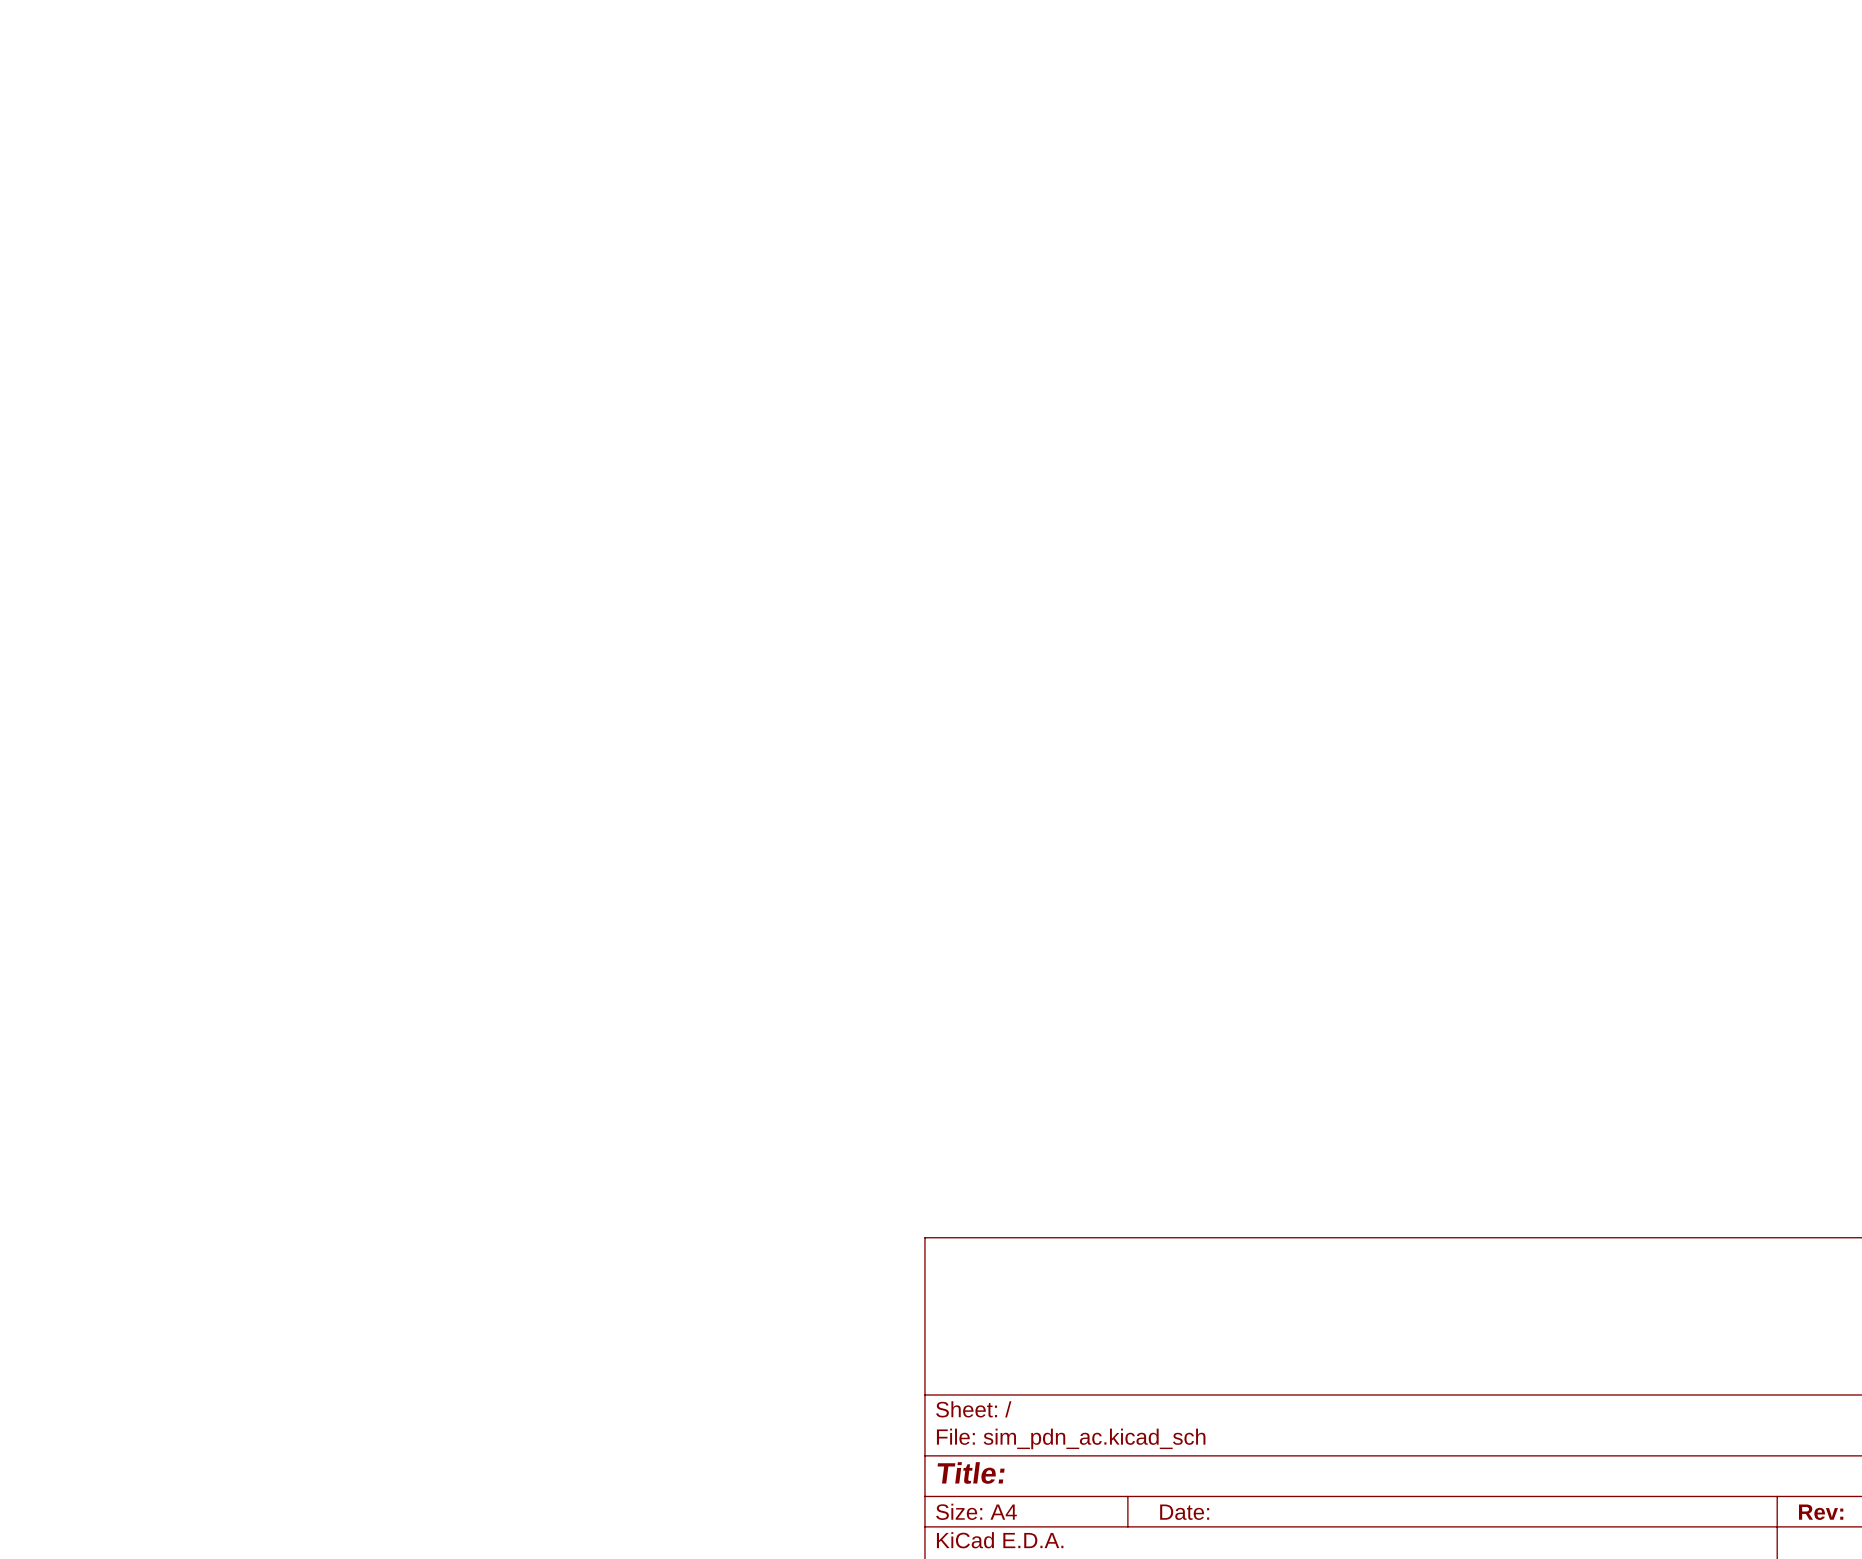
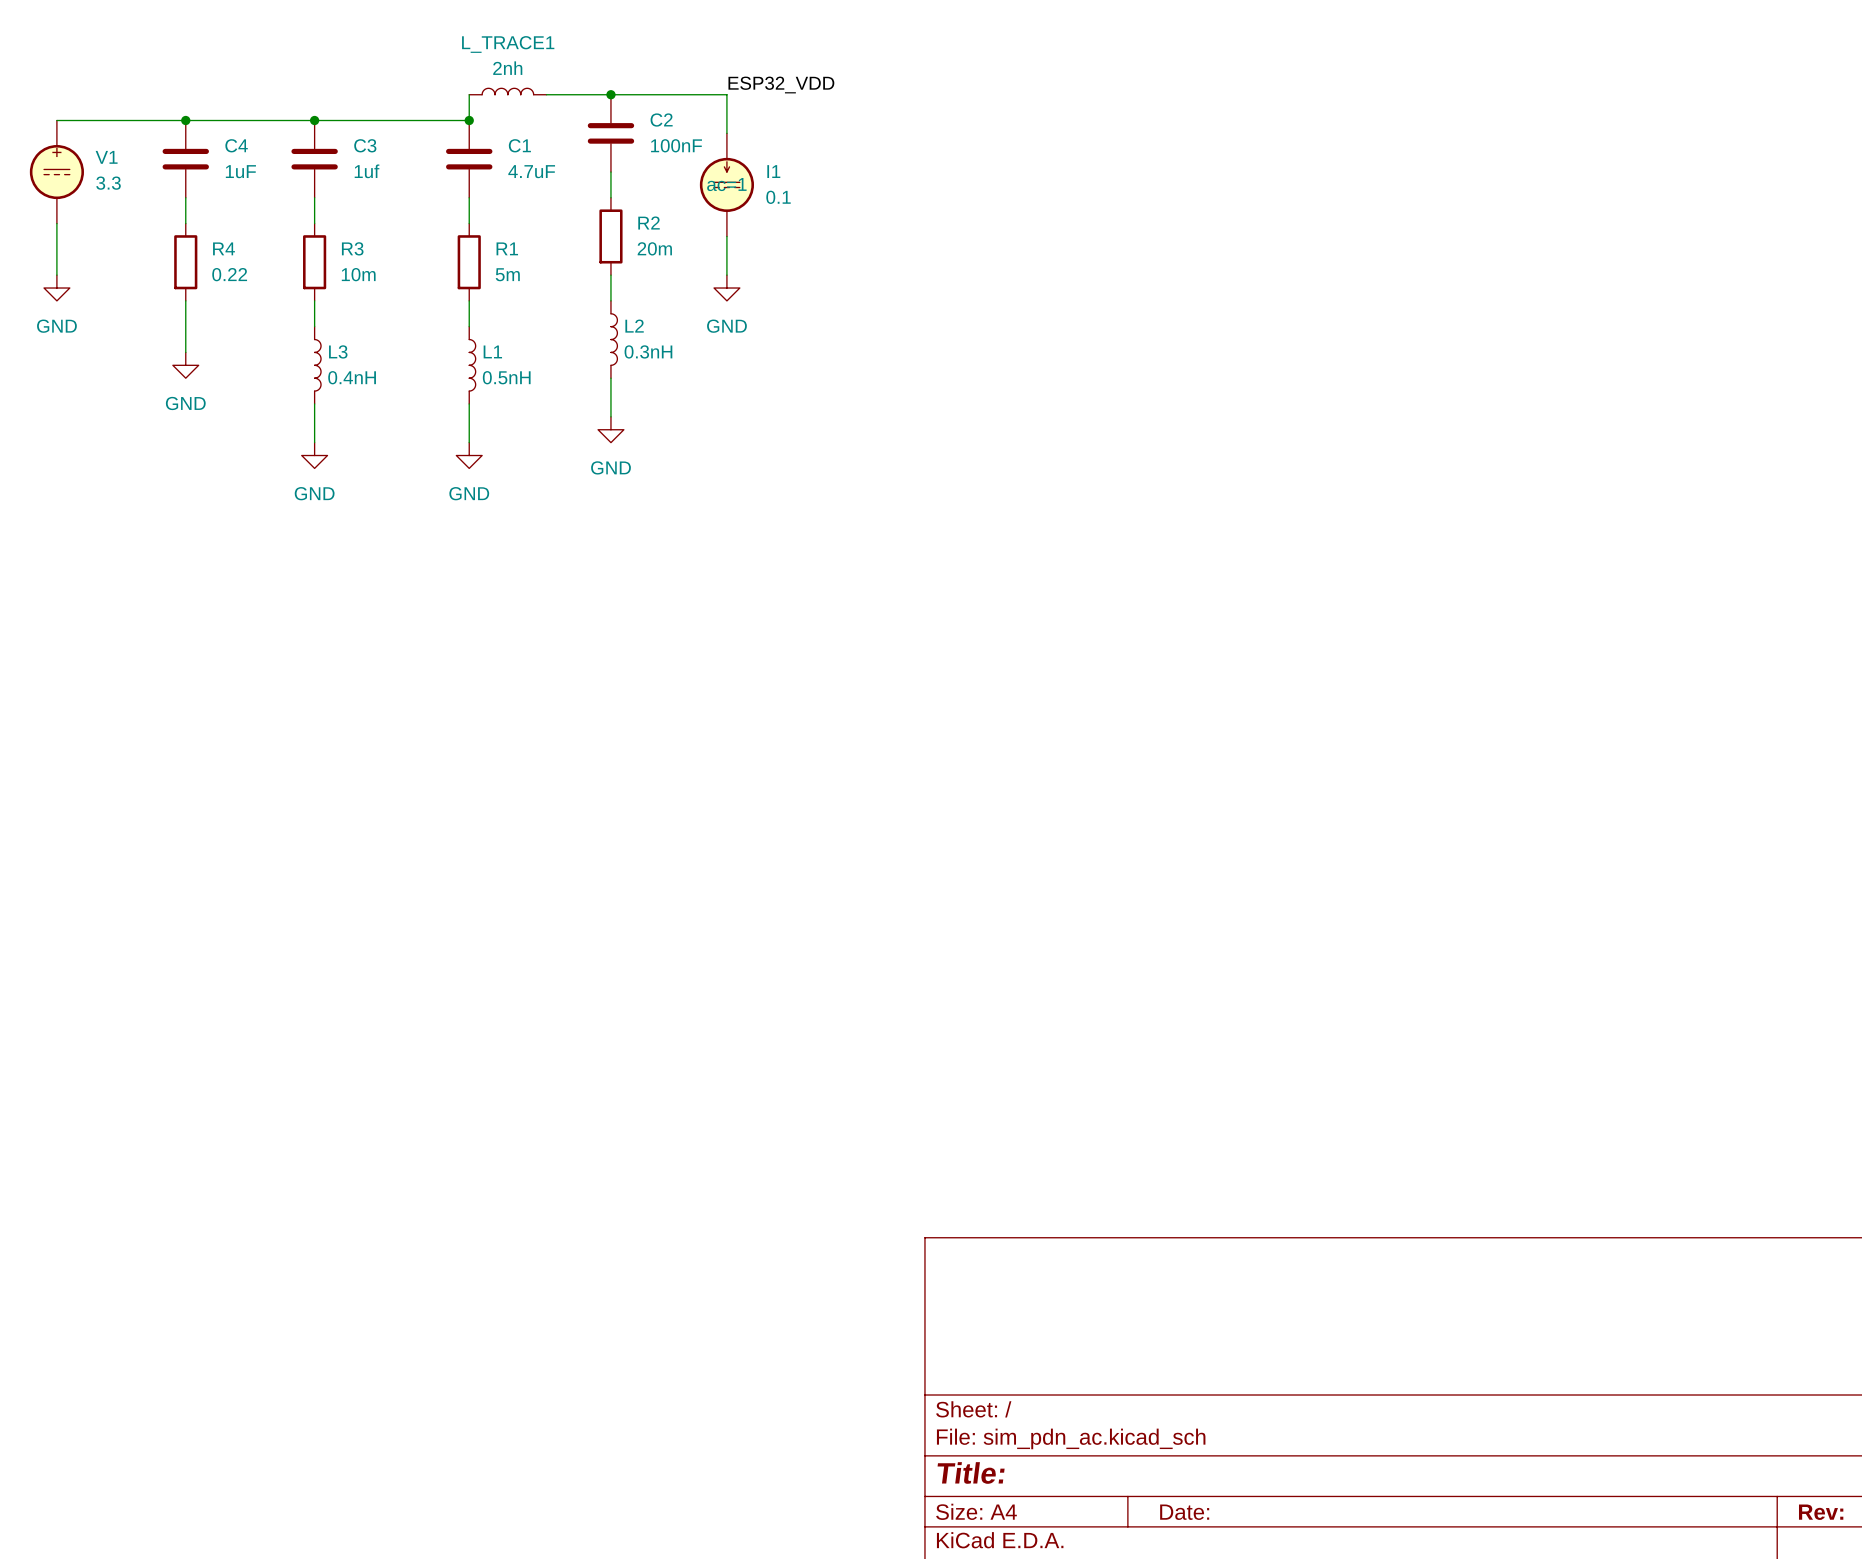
label: none -> ESP32_VDD (781, 85)
L_TRACE1: none -> 2nh (507, 91)
wire: none -> (469, 94) (469, 120) (56, 120)
wire: none -> (546, 94) (726, 94) (726, 133)
junction: none -> (610, 94)
junction: none -> (185, 120)
junction: none -> (314, 120)
junction: none -> (469, 120)
C2: none -> 100nF (610, 133)
C4: none -> 1uF (185, 159)
C3: none -> 1uf (314, 159)
C1: none -> 4.7uF (469, 159)
V1: none -> 3.3 (56, 172)
wire: none -> (610, 172) (610, 197)
I1: none -> 0.1 (726, 184)
wire: none -> (185, 197) (185, 223)
wire: none -> (314, 197) (314, 223)
wire: none -> (469, 197) (469, 223)
wire: none -> (56, 223) (56, 275)
R2: none -> 20m (610, 236)
wire: none -> (726, 236) (726, 275)
R4: none -> 0.22 (185, 262)
R3: none -> 10m (314, 262)
R1: none -> 5m (469, 262)
wire: none -> (610, 275) (610, 300)
power symbol: none -> GND (56, 288)
power symbol: none -> GND (726, 288)
wire: none -> (185, 300) (185, 352)
wire: none -> (314, 300) (314, 326)
wire: none -> (469, 300) (469, 326)
L2: none -> 0.3nH (614, 339)
power symbol: none -> GND (185, 365)
L3: none -> 0.4nH (317, 365)
L1: none -> 0.5nH (472, 365)
wire: none -> (610, 378) (610, 416)
wire: none -> (314, 403) (314, 442)
wire: none -> (469, 403) (469, 442)
power symbol: none -> GND (610, 429)
power symbol: none -> GND (314, 455)
power symbol: none -> GND (469, 455)

